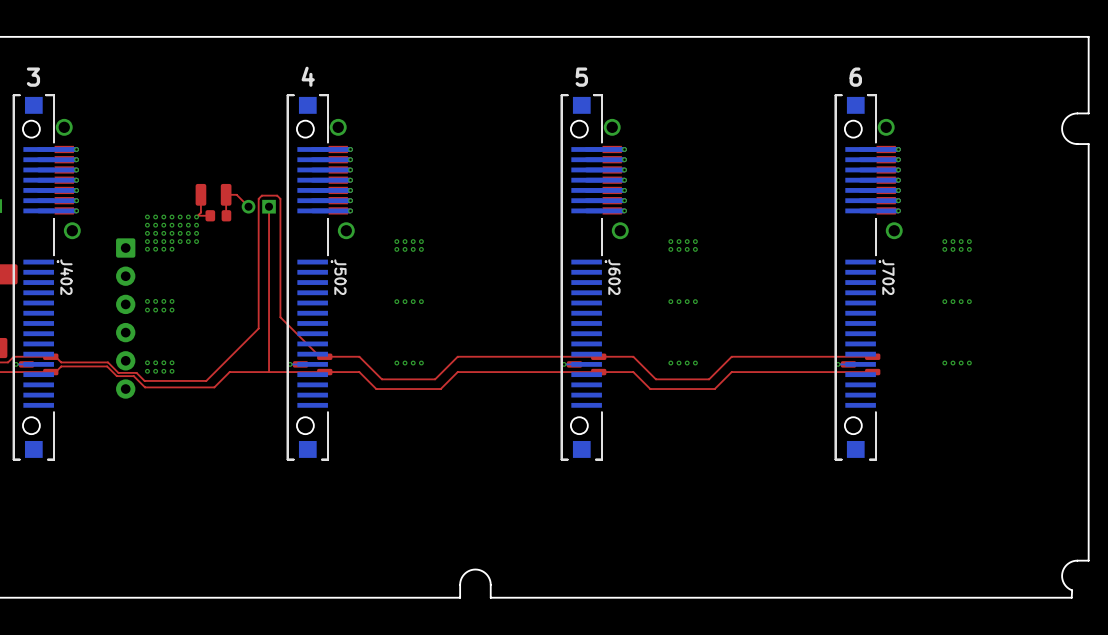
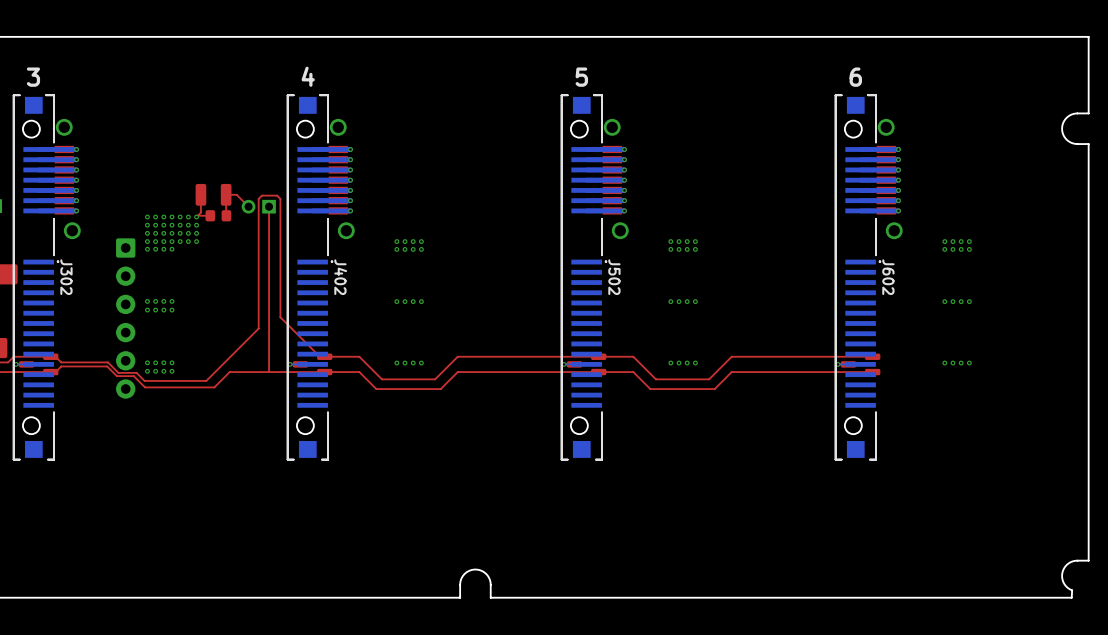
J402 name: J402 (66, 277) -> J302 (66, 277)
J502 name: J502 (340, 277) -> J402 (340, 277)
J602 name: J602 (614, 277) -> J502 (614, 277)
J702 name: J702 (888, 277) -> J602 (888, 277)

